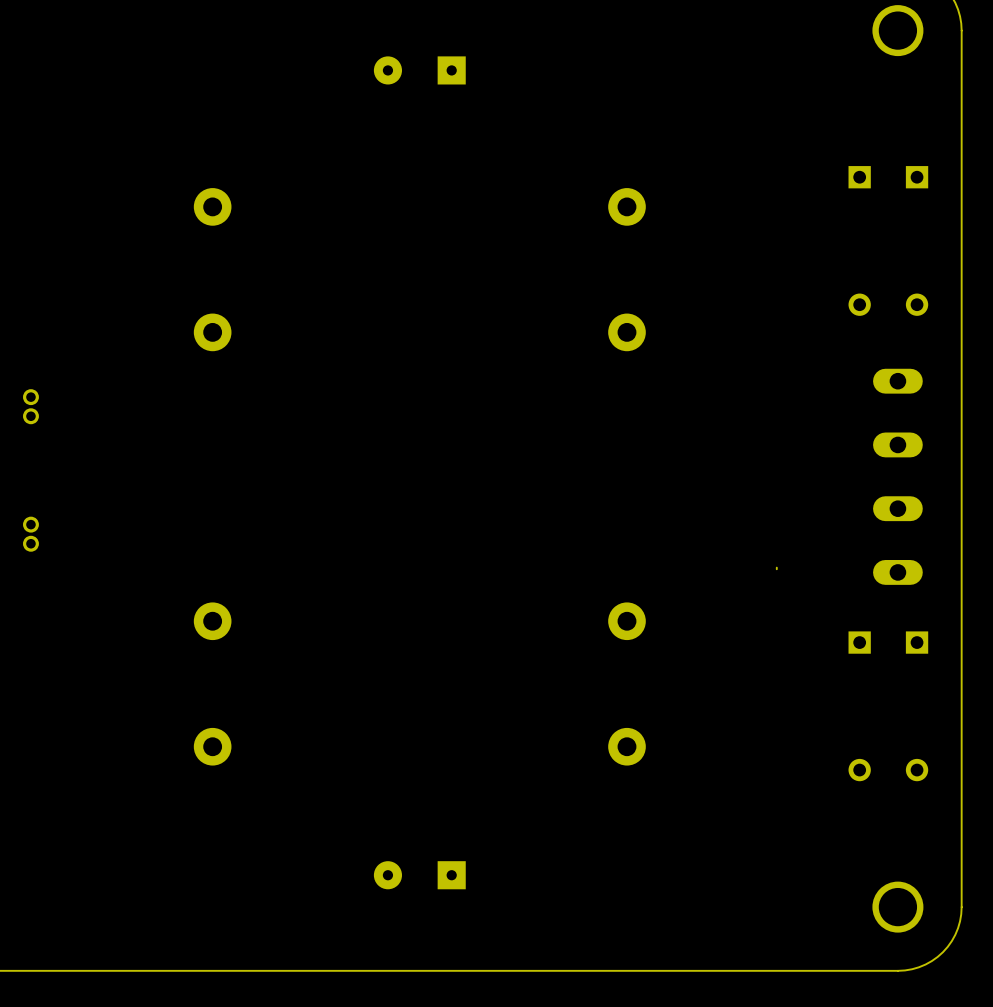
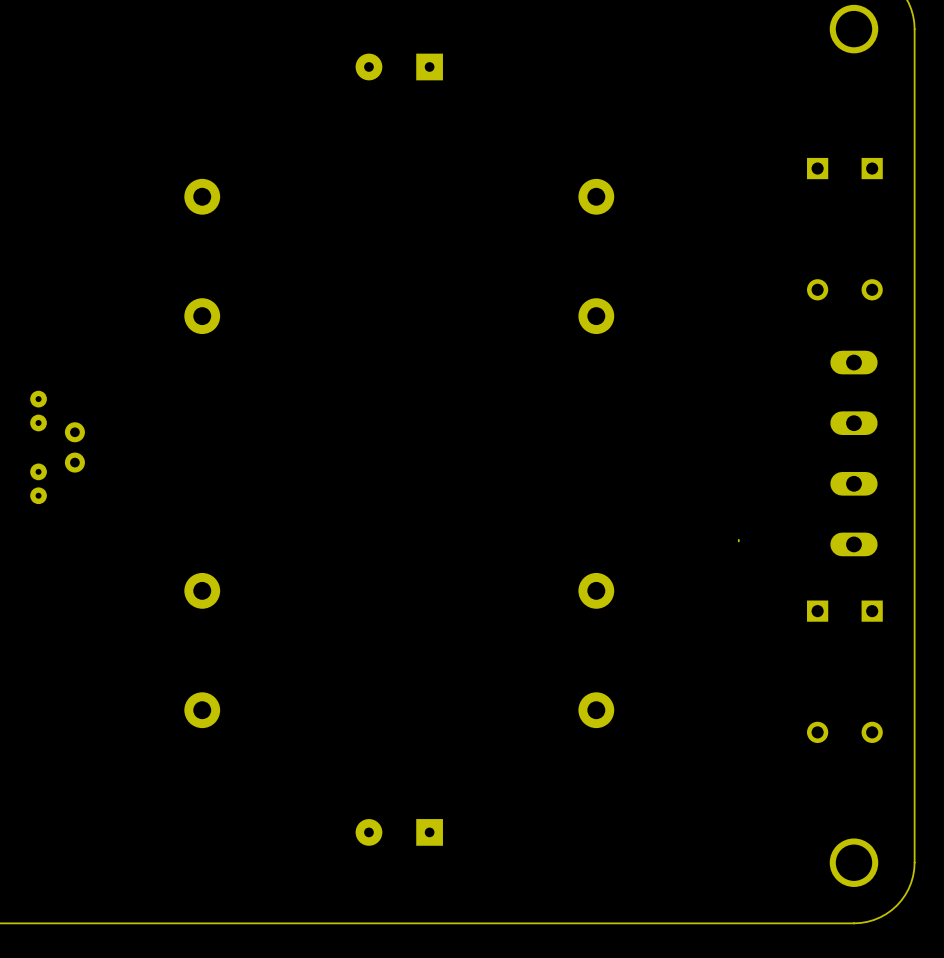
part: (30, 406) -> none
part: none -> (38, 411)
part: none -> (74, 447)
part: none -> (38, 483)
part: (30, 534) -> none

